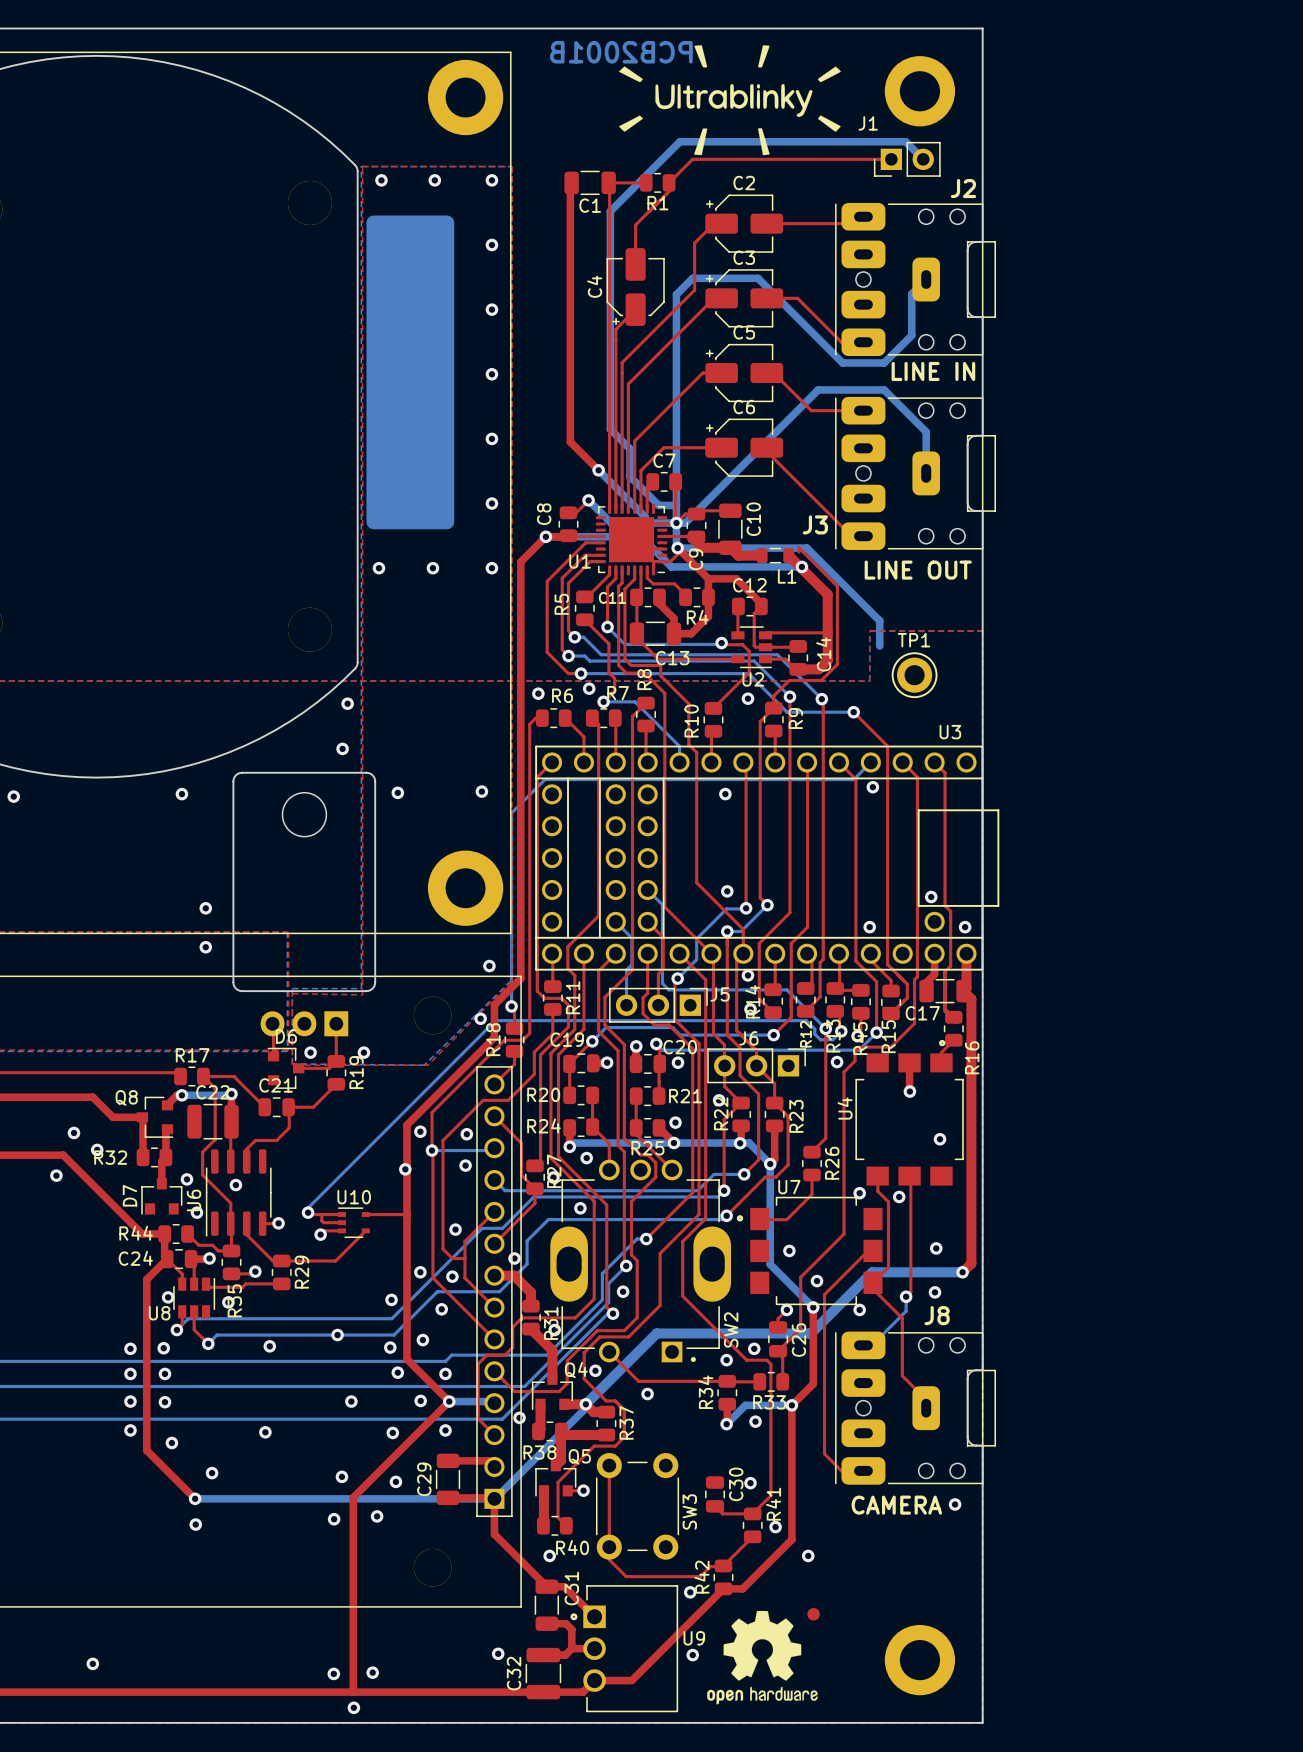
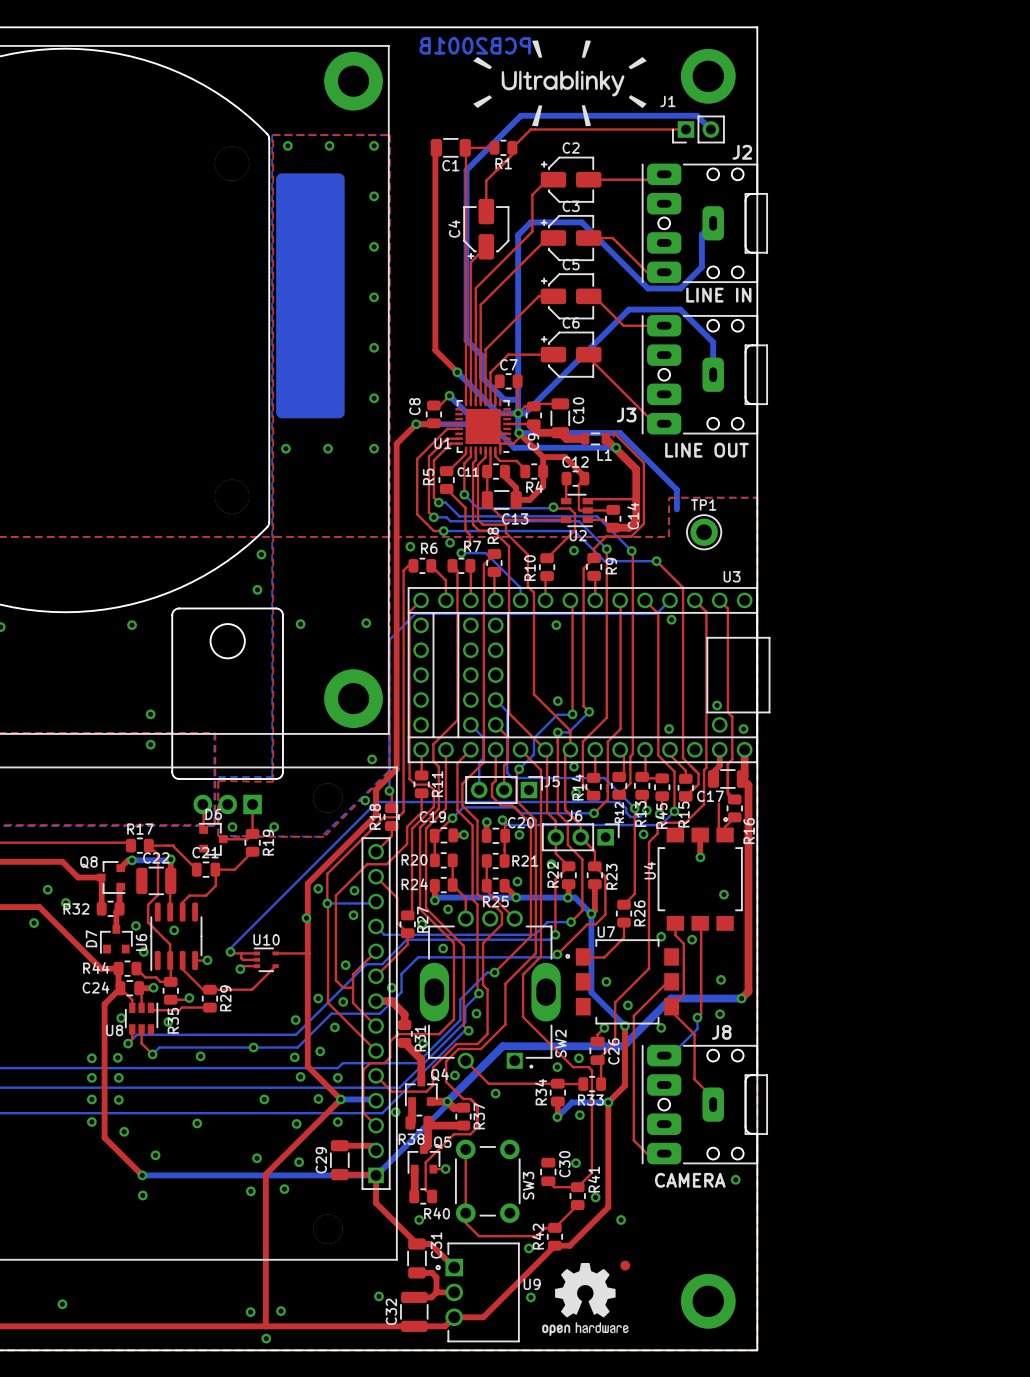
top track: none -> (718, 803) (718, 832)

